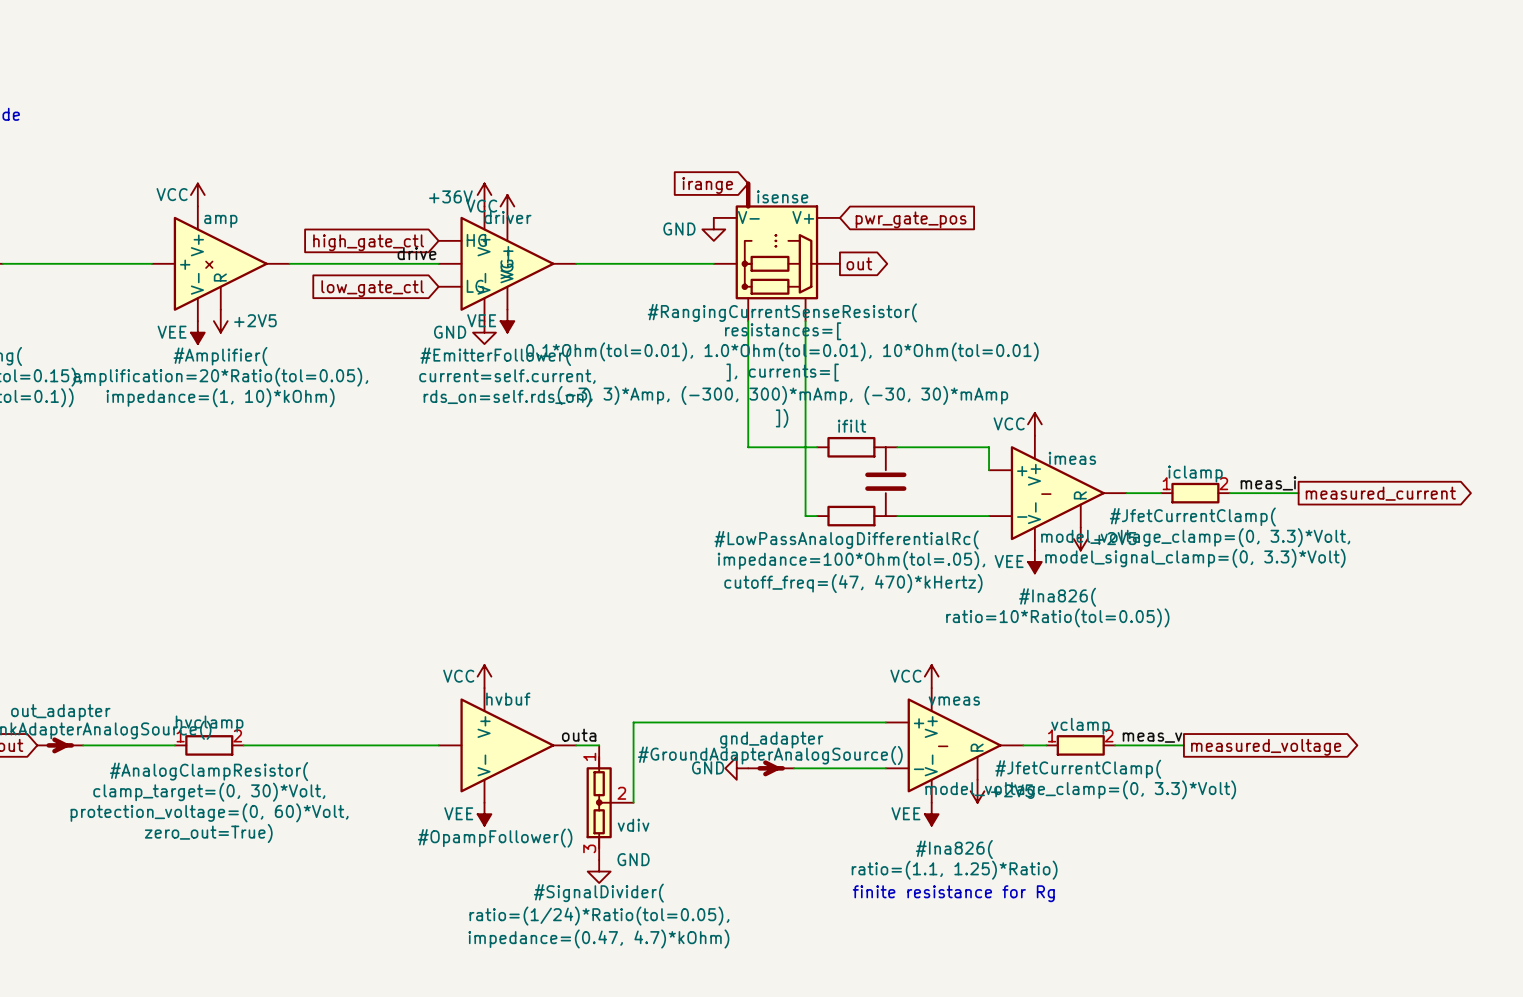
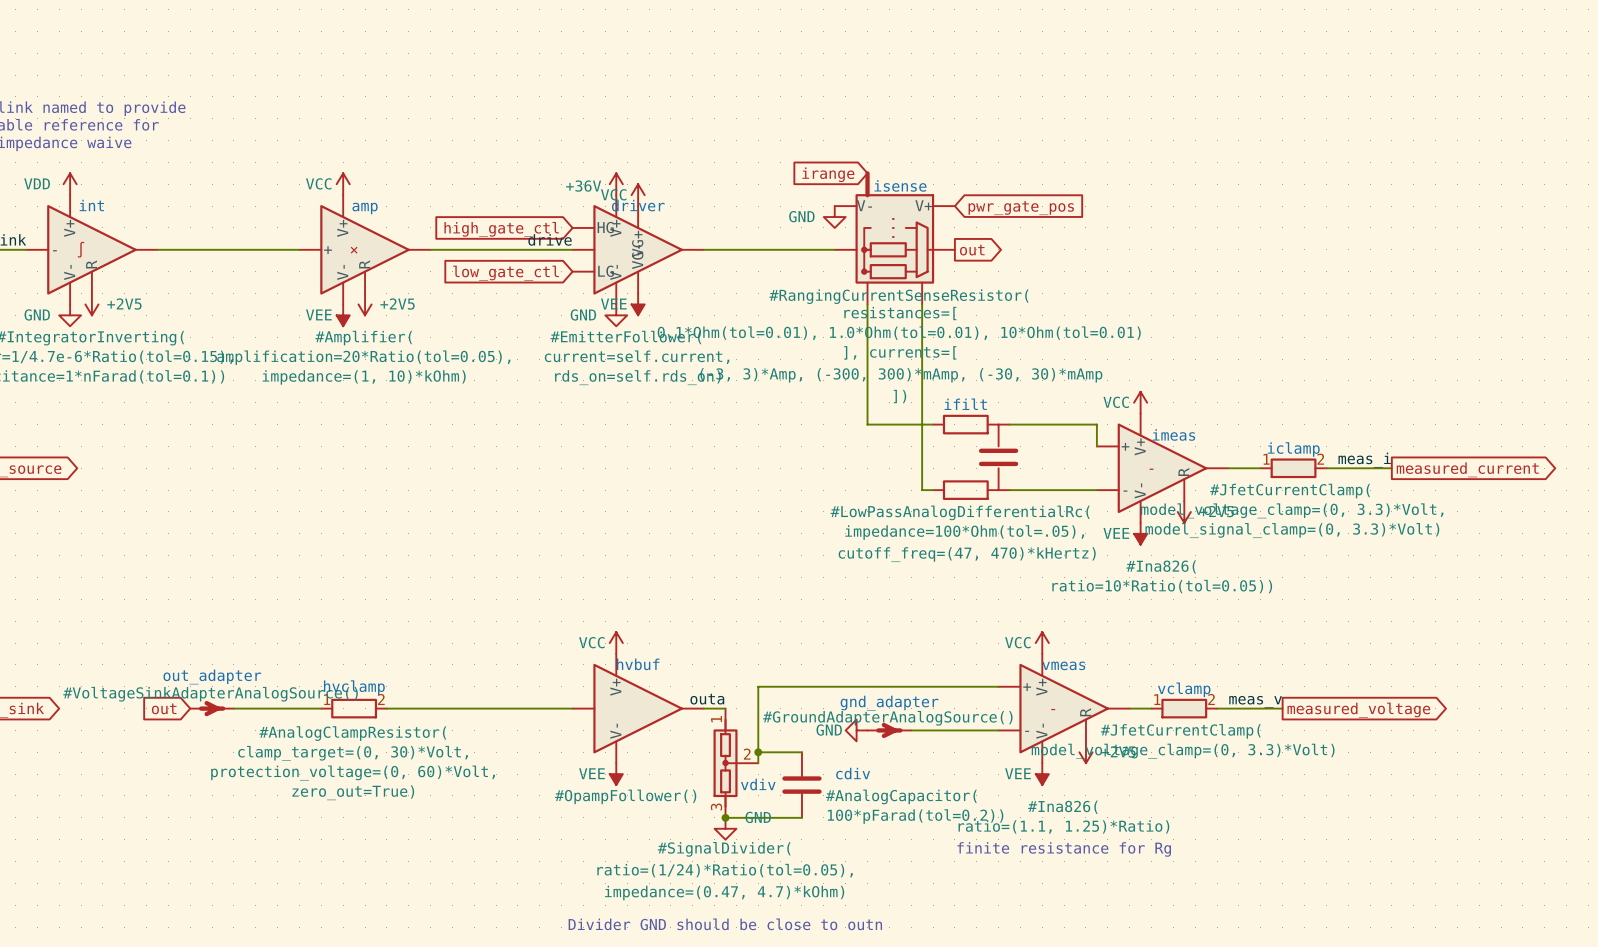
wire: none -> (758, 752) (801, 752)
junction: none -> (758, 752)
cdiv: none -> #AnalogCapacitor( (801, 785)
wire: none -> (725, 817) (801, 817)
junction: none -> (725, 817)
text: none -> Divider GND should be close to outn (725, 924)

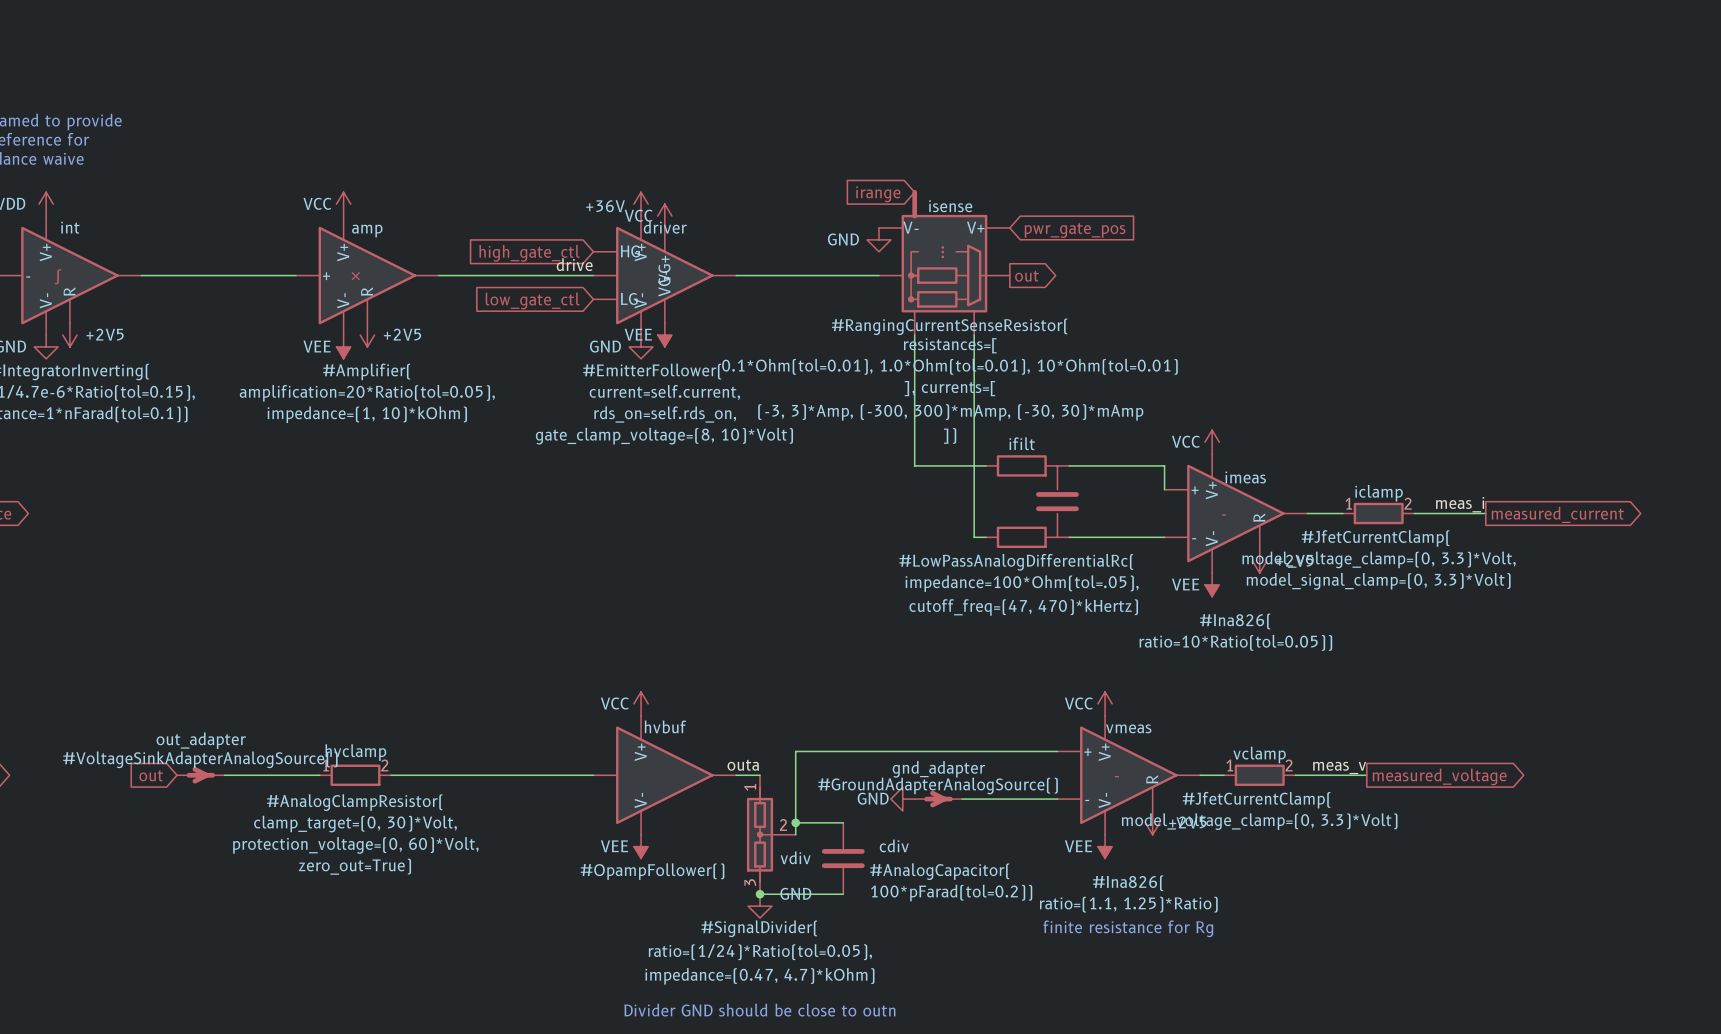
driver text: rds_on=self.rds_on) (637, 377) -> rds_on=self.rds_on, (665, 414)
driver text: none -> gate_clamp_voltage=(8, 10)*Volt) (664, 436)

